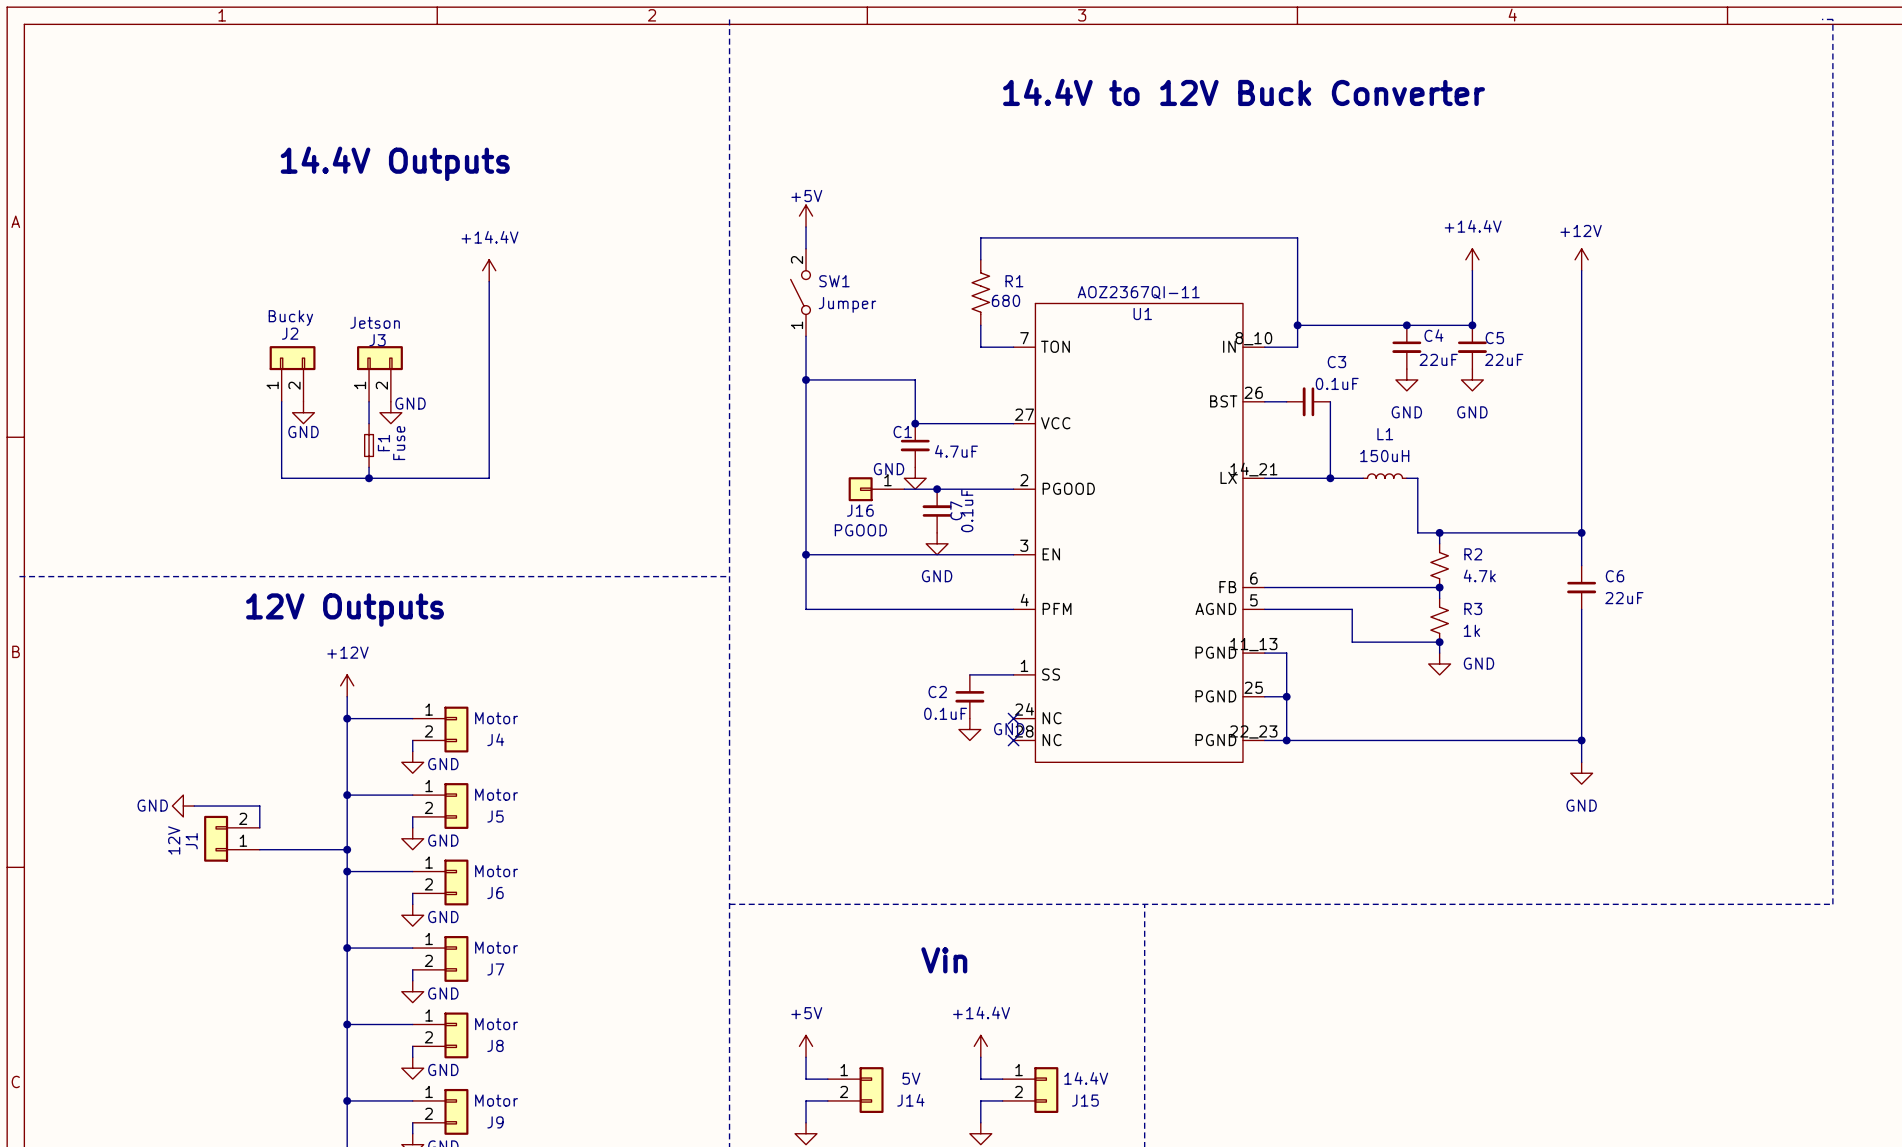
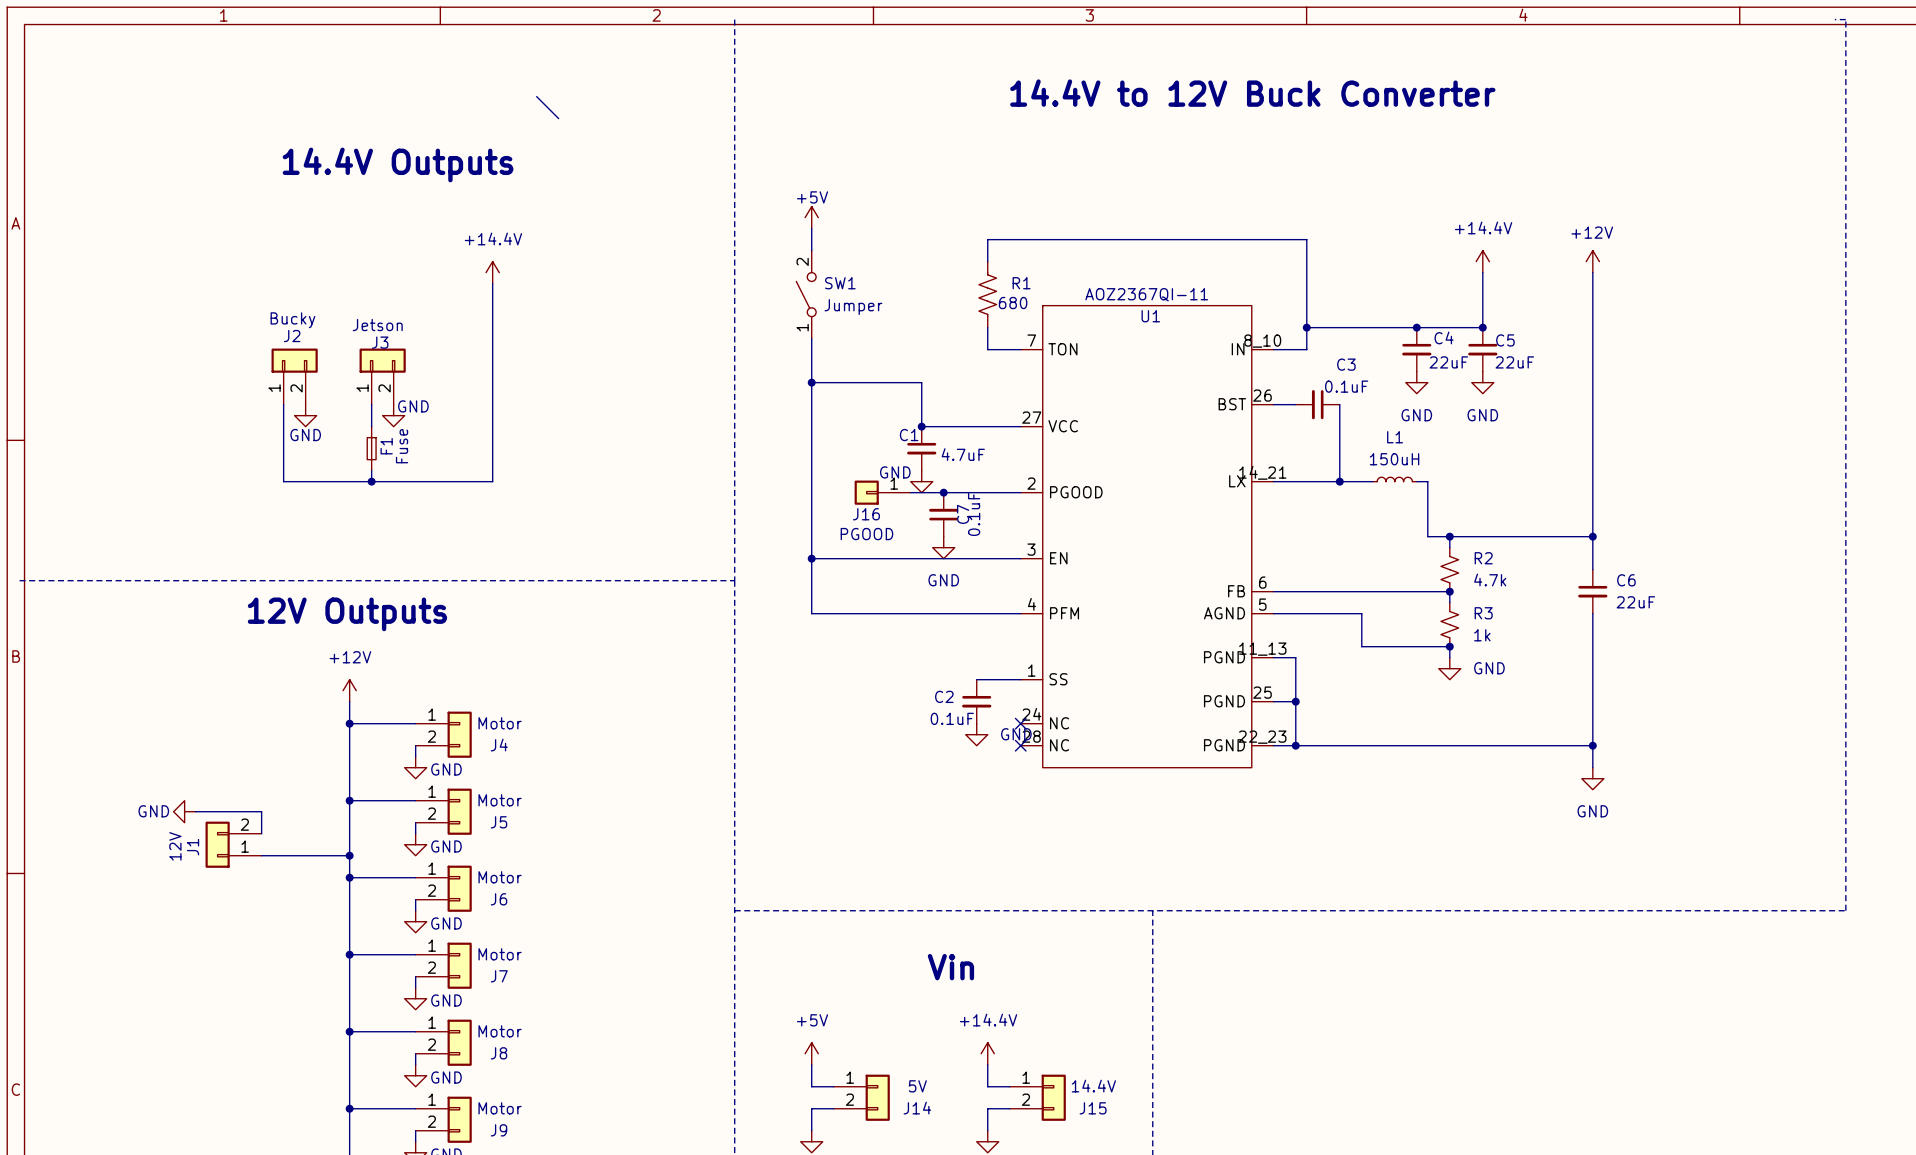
wire: none -> (536, 96) (558, 118)

